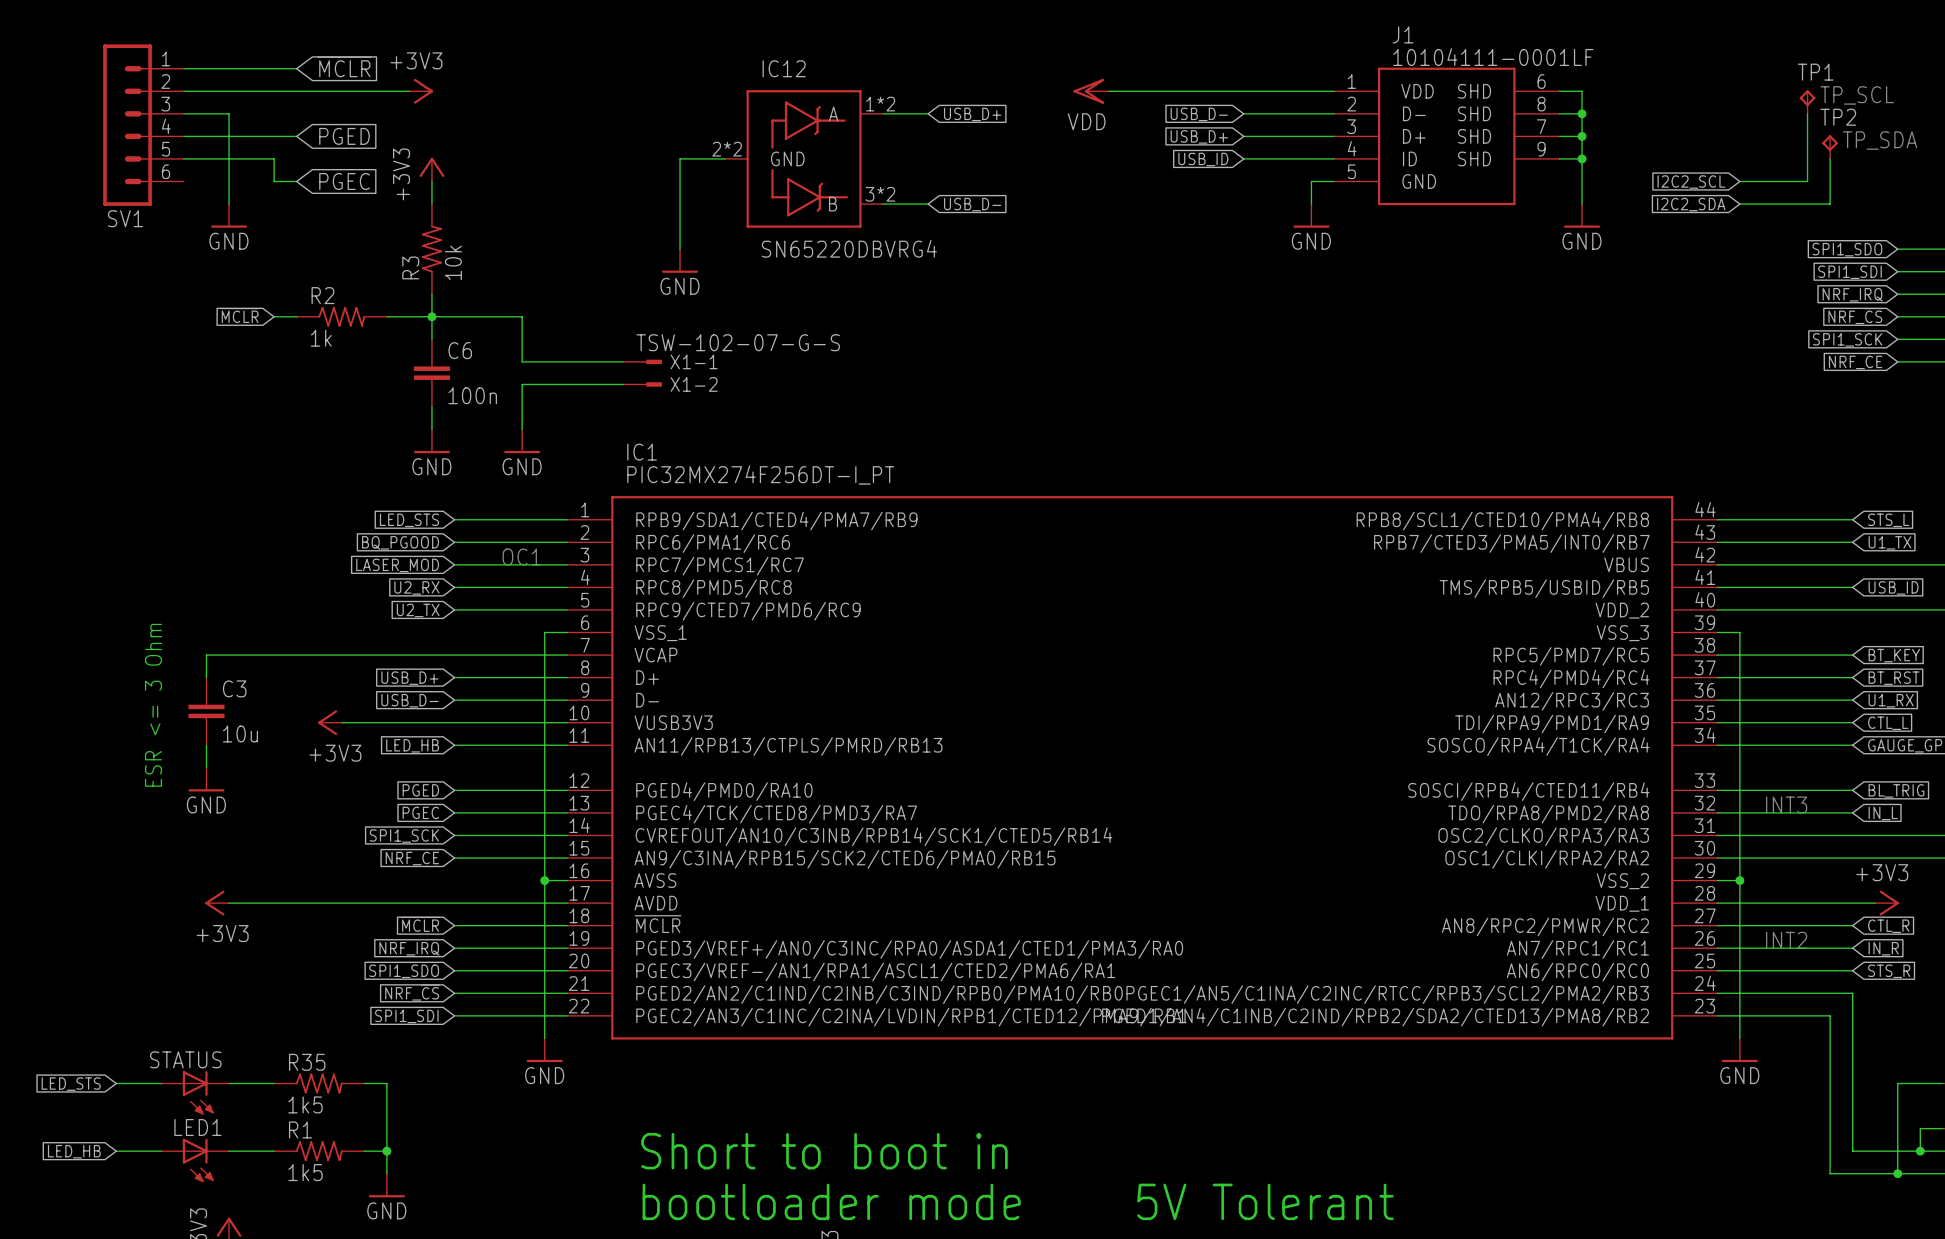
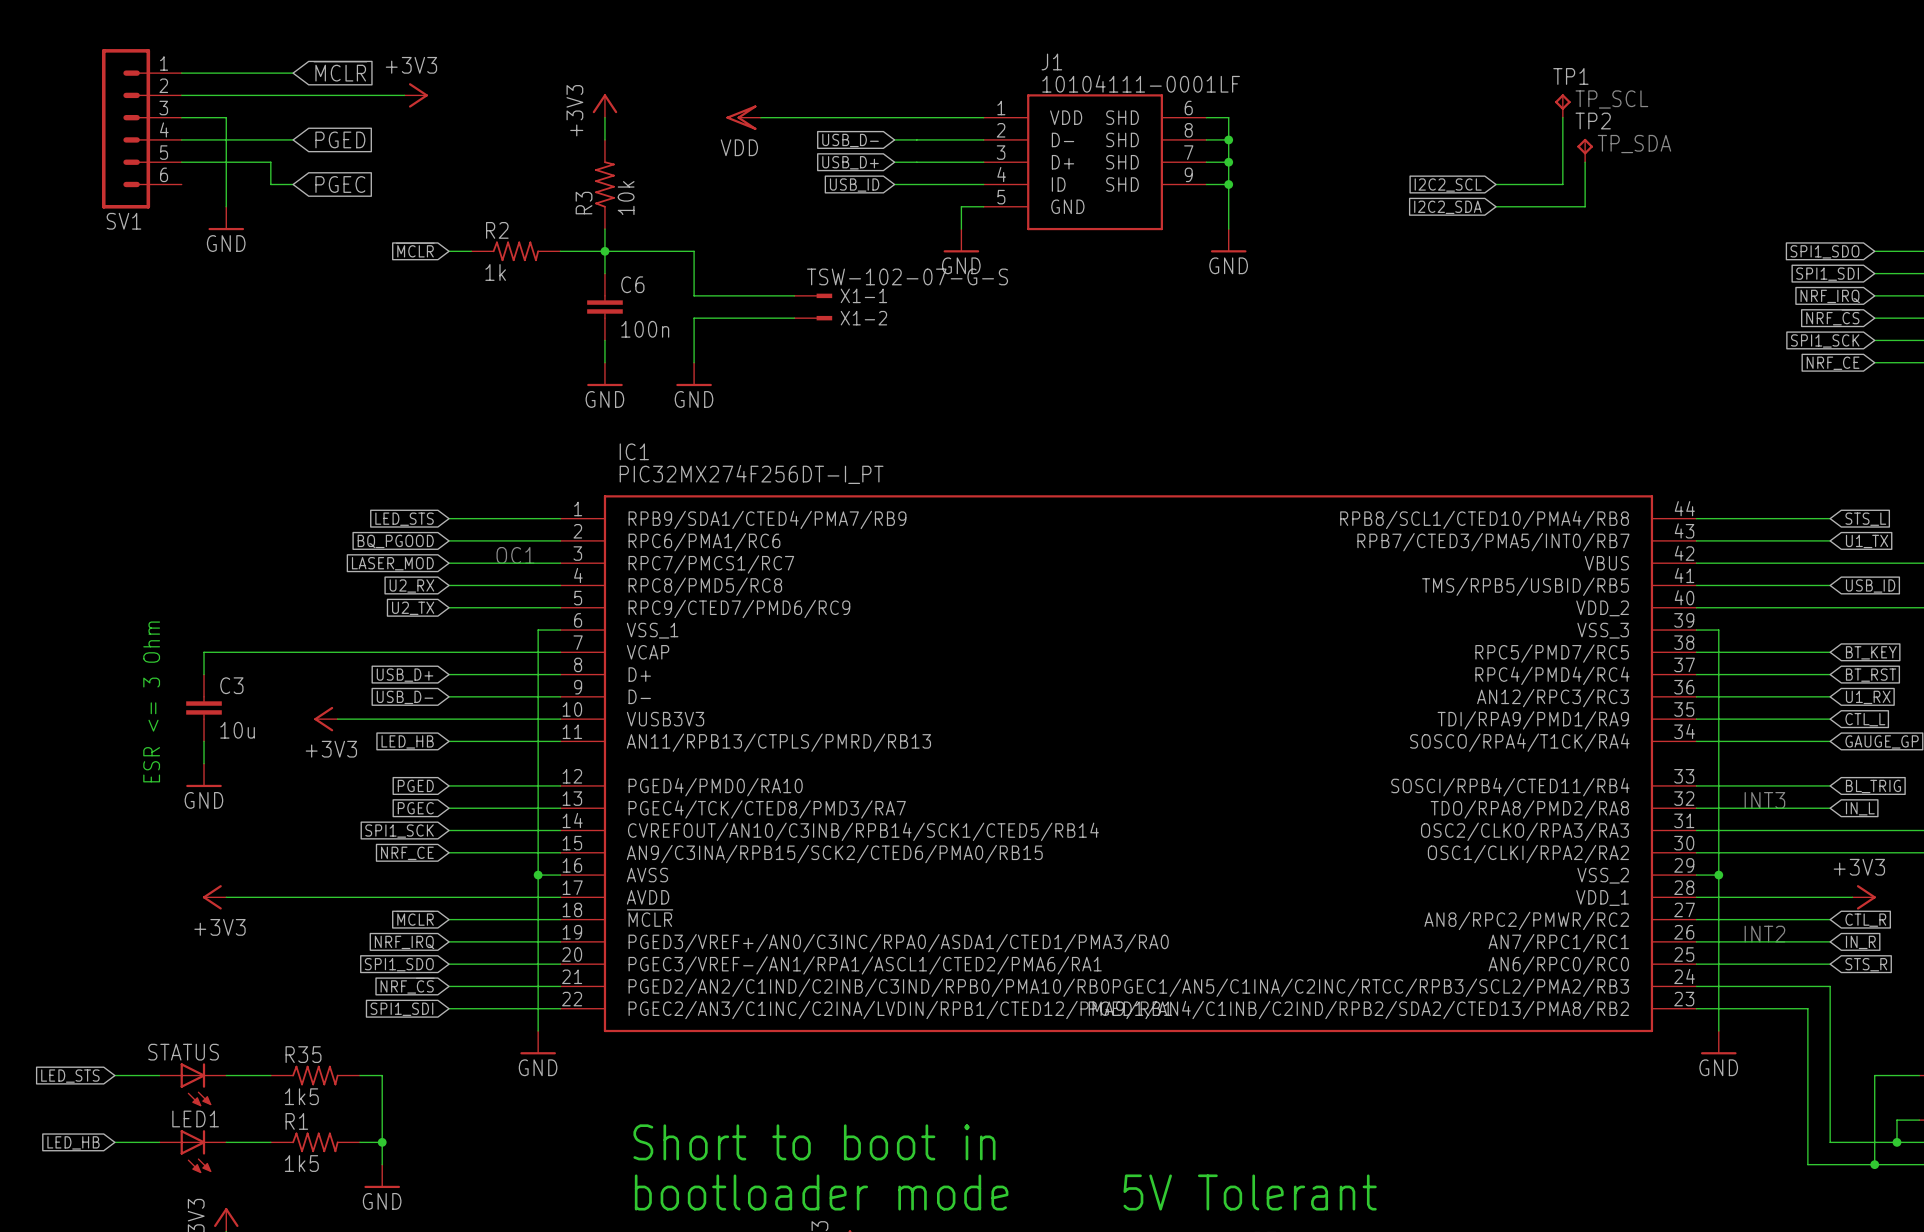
power symbol: VDD (1091, 91) -> none
wire: (1108, 91) (1333, 91) -> none
wire: (1559, 91) (1582, 91) (1582, 113) (1559, 113) -> none
TP1 position: (1807, 102) -> (1562, 105)
power symbol: none -> VDD (743, 117)
wire: none -> (760, 117) (872, 117)
wire: none -> (916, 117) (983, 117)
wire: none -> (1206, 117) (1228, 117) (1228, 229)
wire: (1243, 113) (1333, 113) -> none
junction: (1582, 113) -> none
wire: (1807, 113) (1807, 181) (1739, 181) -> none
global label rotation: 0° (972, 114) -> 180° (850, 162)
global label position: USB_D+ (972, 114) -> USB_D+ (850, 162)
global label: USB_D- (1199, 114) -> none
wire: none -> (894, 139) (983, 139)
global label: USB_D+ (1199, 136) -> none
wire: (1243, 136) (1333, 136) -> (1228, 139) (1206, 139)
junction: none -> (1228, 139)
J1 position: (1446, 136) -> (1095, 162)
wire: (1559, 136) (1582, 136) -> none
junction: (1582, 136) -> none
TP2 position: (1830, 147) -> (1585, 150)
wire: (725, 158) (680, 158) (680, 249) -> none
IC12: SN65220DBVRG4 (804, 158) -> none
wire: none -> (894, 162) (983, 162)
wire: (1243, 158) (1333, 158) -> (1228, 162) (1206, 162)
junction: none -> (1228, 162)
wire: (1559, 158) (1582, 158) -> none
junction: (1582, 158) -> none
wire: none -> (1585, 162) (1585, 206) (1496, 206)
wire: (1830, 158) (1830, 204) (1739, 204) -> none
global label: USB_ID (1203, 159) -> none
power symbol position: +3V3 (431, 169) -> +3V3 (604, 105)
wire: (431, 181) (431, 204) -> (604, 117) (604, 139)
wire: none -> (894, 184) (983, 184)
wire: none -> (1206, 184) (1228, 184)
junction: none -> (1228, 184)
wire: (1333, 181) (1311, 181) (1311, 204) -> none
wire: (1582, 181) (1582, 204) -> (1562, 184) (1496, 184)
global label: none -> USB_ID (854, 185)
global label: none -> I2C2_SCL (1448, 185)
global label: I2C2_SCL (1691, 182) -> none
wire: (882, 204) (928, 204) -> none
global label rotation: 0° (972, 204) -> 180° (850, 140)
global label position: USB_D- (972, 204) -> USB_D- (850, 140)
wire: none -> (983, 206) (961, 206) (961, 229)
global label: none -> I2C2_SDA (1447, 207)
global label: I2C2_SDA (1691, 204) -> none
power symbol position: GND (1311, 215) -> GND (1228, 240)
power symbol: GND (1582, 215) -> none
power symbol: none -> GND (961, 240)
R3 position: (431, 249) -> (604, 184)
junction: none -> (604, 251)
power symbol: GND (680, 260) -> none
wire: (431, 294) (431, 339) -> (604, 229) (604, 273)
global label position: ~{MCLR} (239, 315) -> ~{MCLR} (415, 250)
wire: (274, 316) (296, 316) -> (449, 251) (471, 251)
R2 position: (341, 316) -> (515, 251)
wire: (386, 316) (522, 316) (522, 361) (623, 361) -> (560, 251) (694, 251) (694, 295) (794, 295)
junction: (431, 316) -> none
X1-1 position: (642, 361) -> (813, 295)
C6 position: (431, 373) -> (604, 307)
power symbol: none -> GND (604, 374)
power symbol: none -> GND (694, 374)
wire: (623, 384) (522, 384) (522, 429) -> (794, 318) (694, 318) (694, 362)
X1-2 position: (642, 384) -> (813, 318)
wire: (431, 407) (431, 429) -> (604, 340) (604, 362)
power symbol: GND (431, 441) -> none
power symbol: GND (522, 441) -> none

